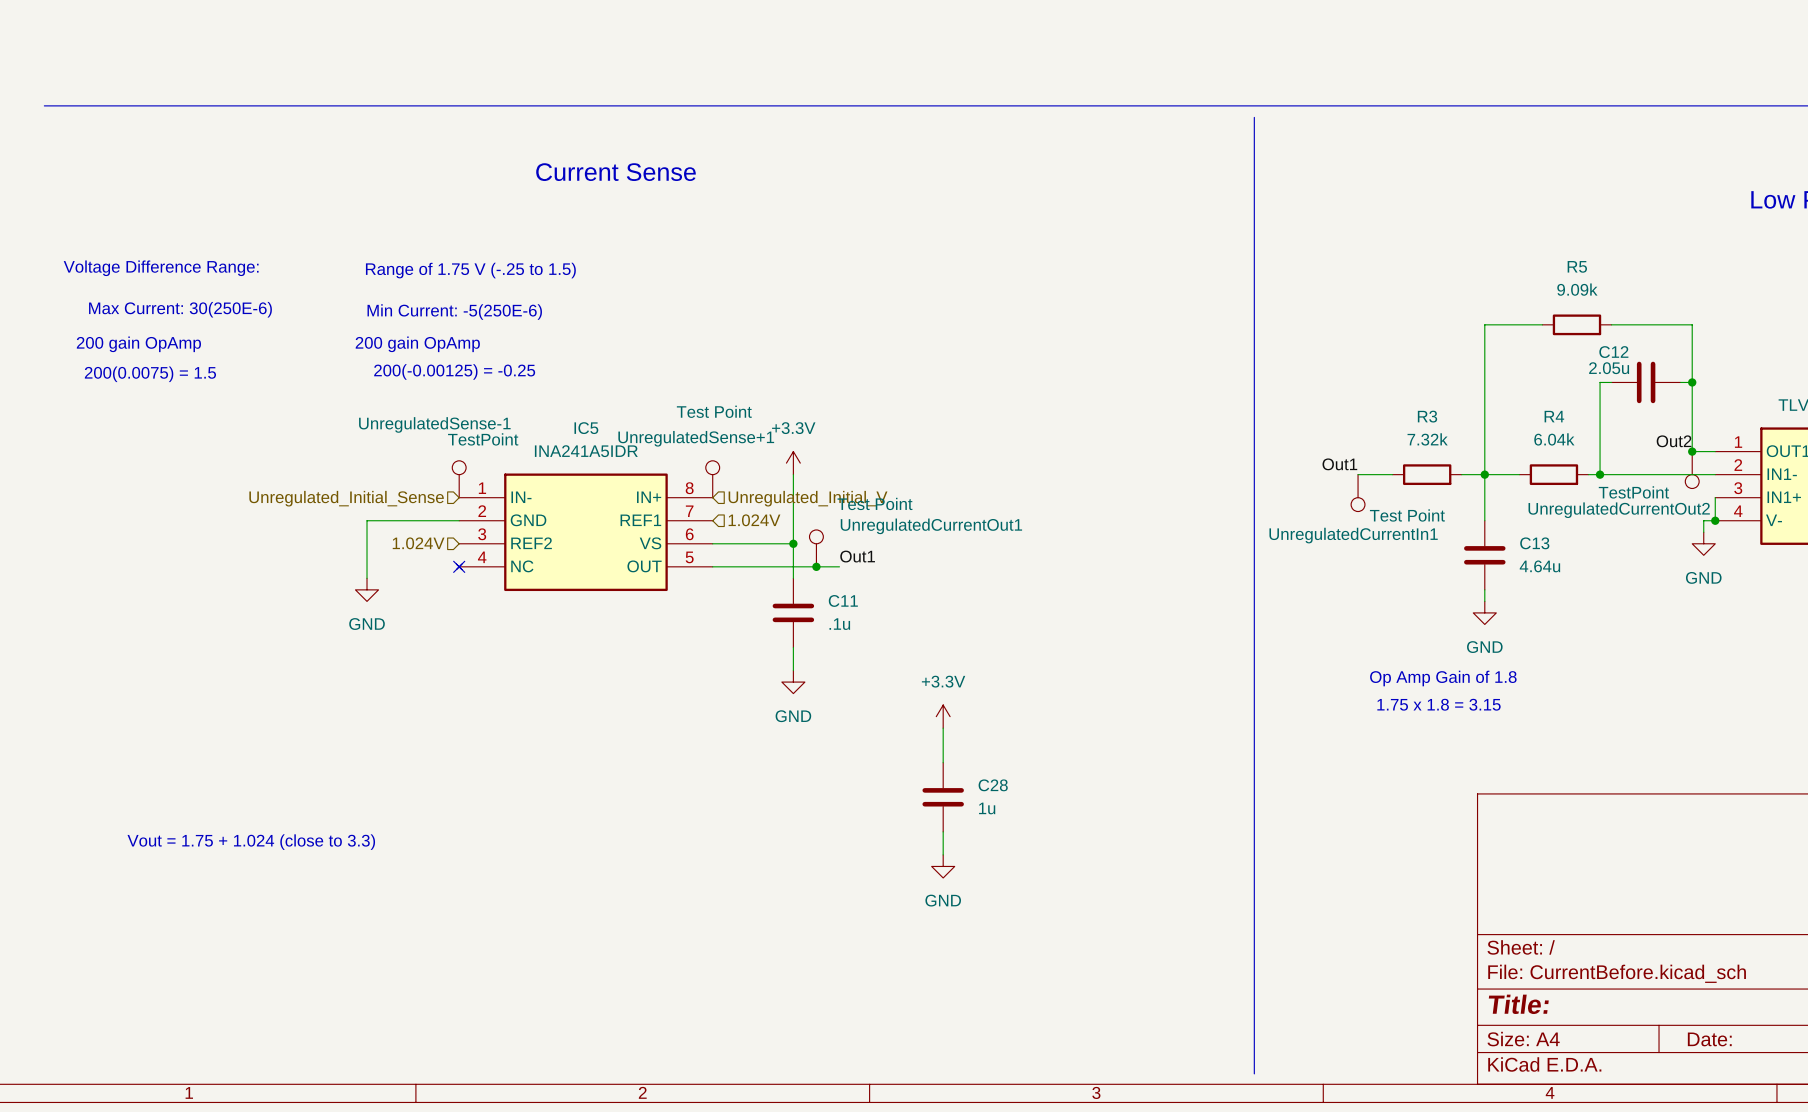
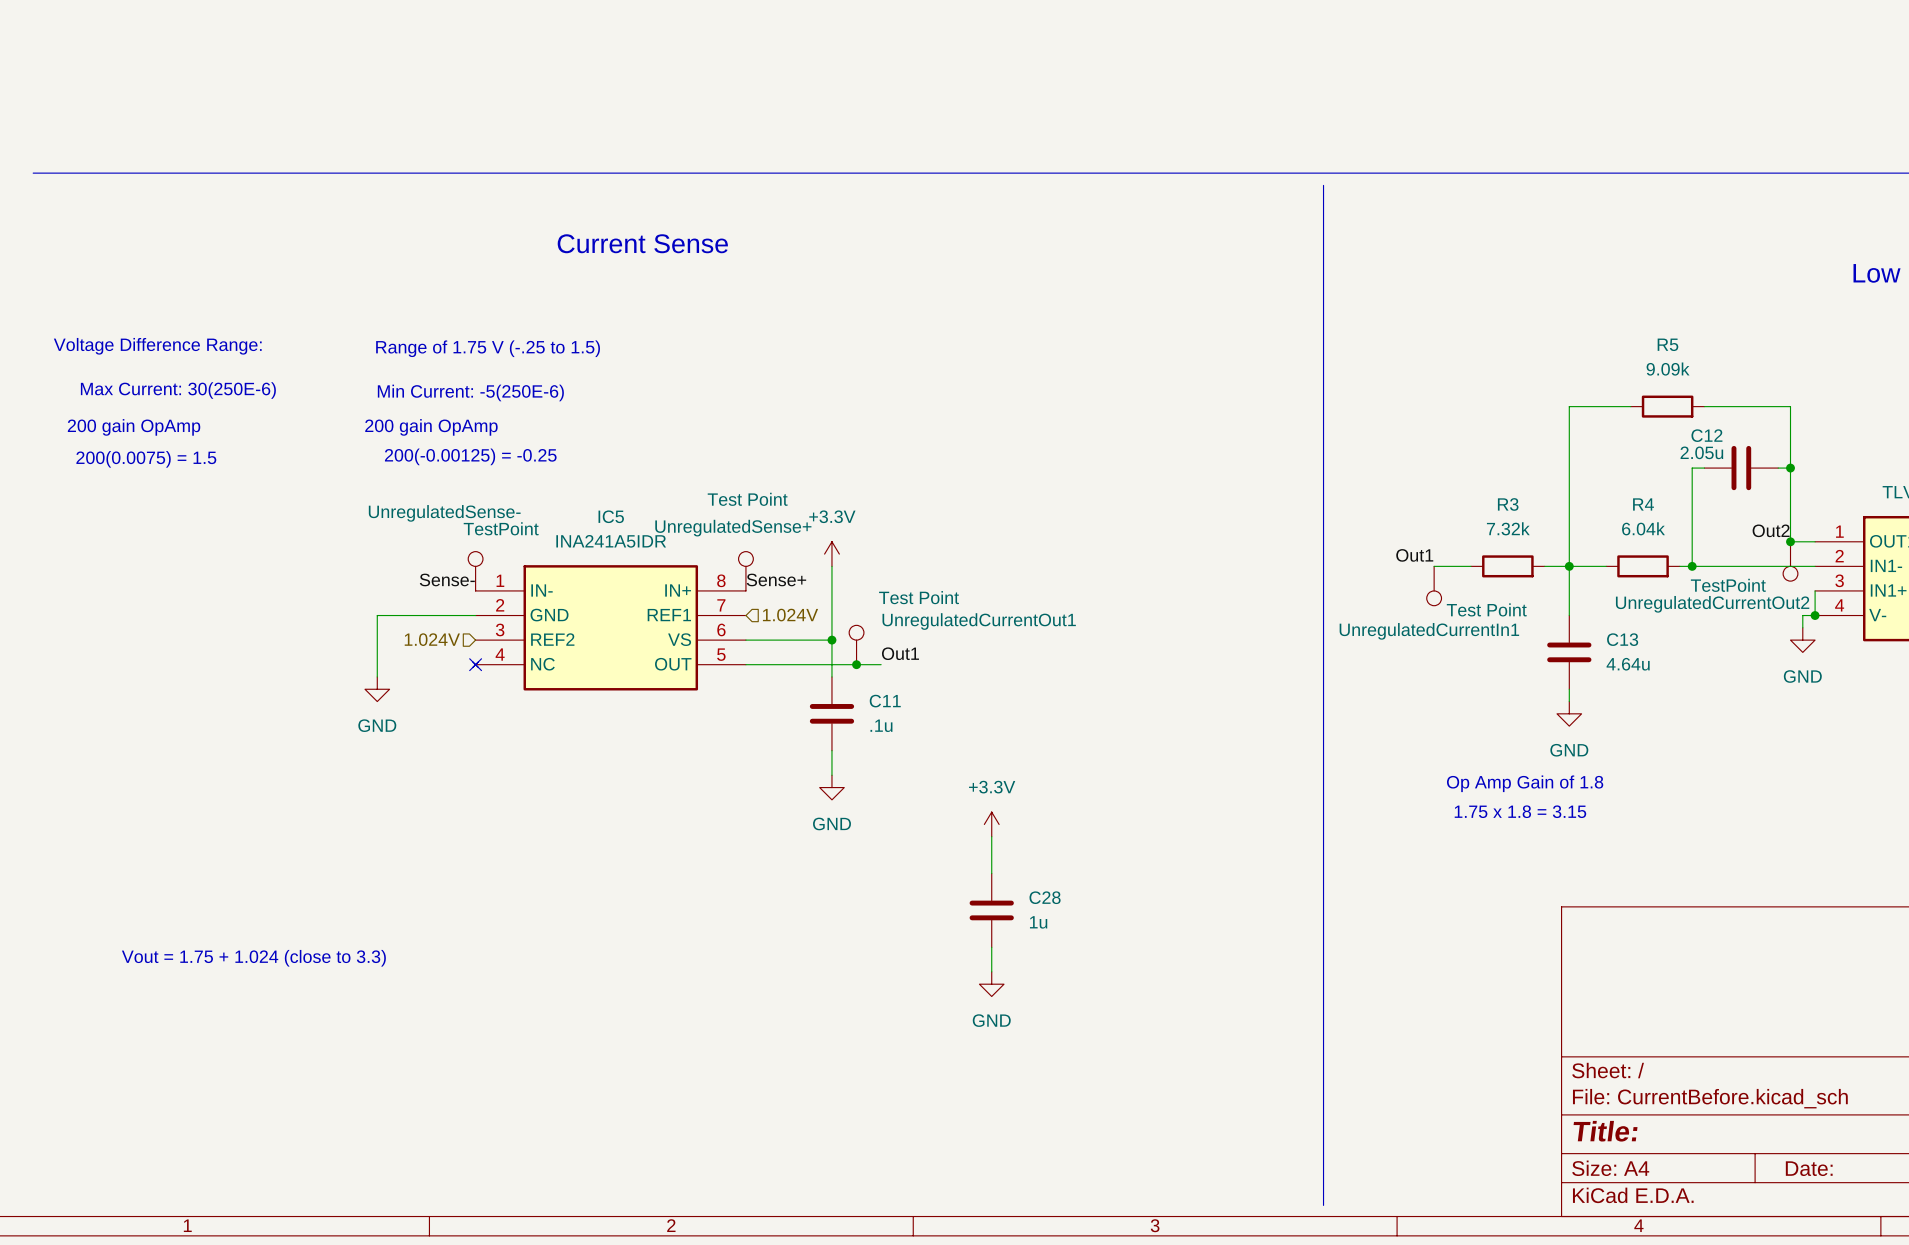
UnregulatedSense-1 name: UnregulatedSense-1 (434, 424) -> UnregulatedSense- (444, 513)
UnregulatedSense+1 name: UnregulatedSense+1 (696, 438) -> UnregulatedSense+ (733, 528)
label: none -> Sense- (447, 579)
label: none -> Sense+ (776, 579)
hierarchical label: Unregulated_Initial_Sense (346, 498) -> none
hierarchical label: Unregulated_Initial_V (808, 498) -> none

